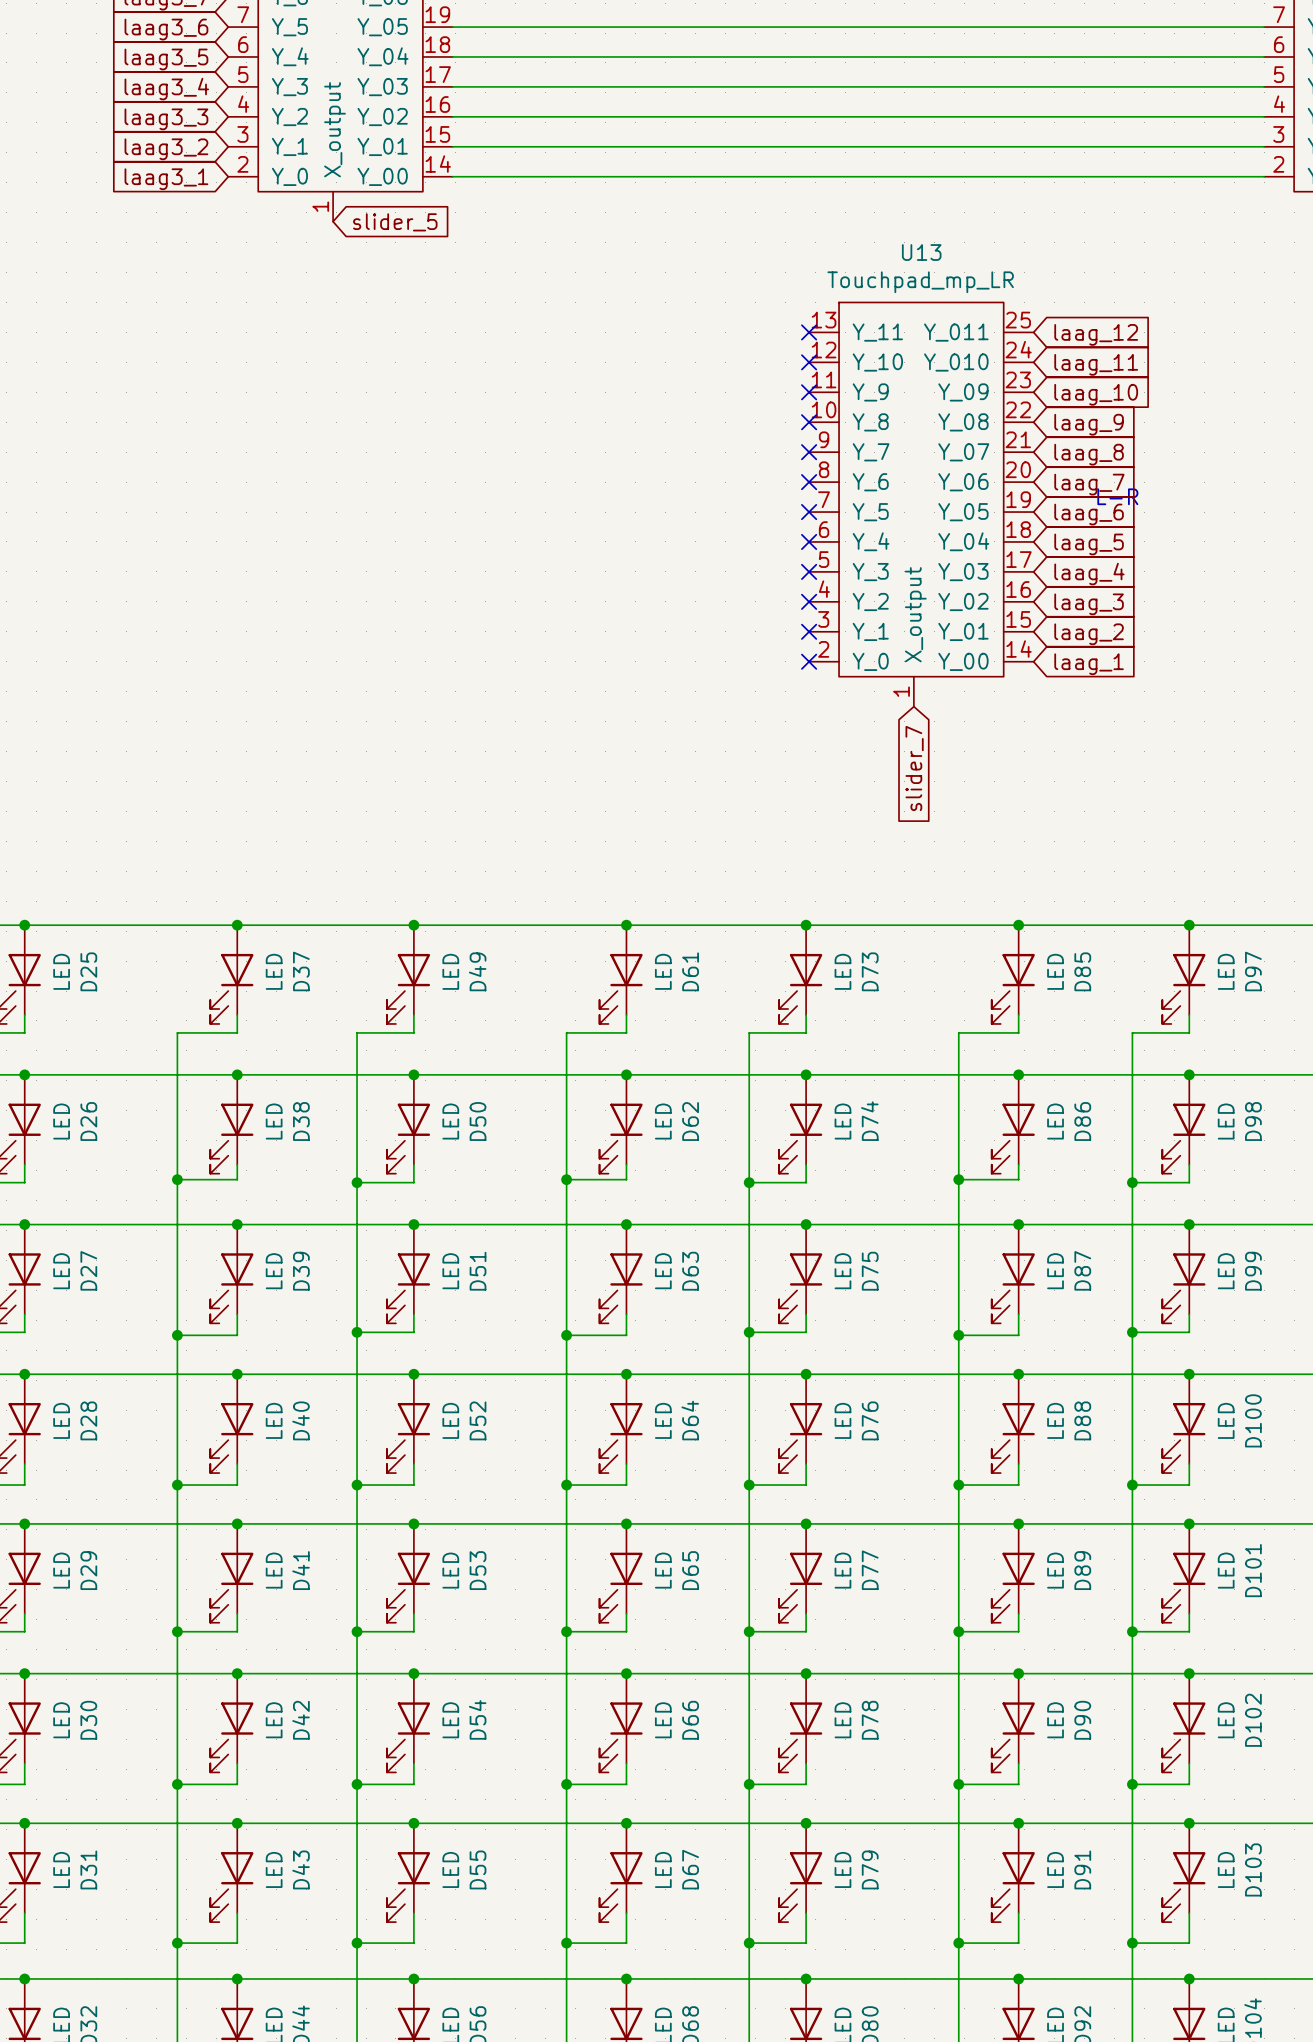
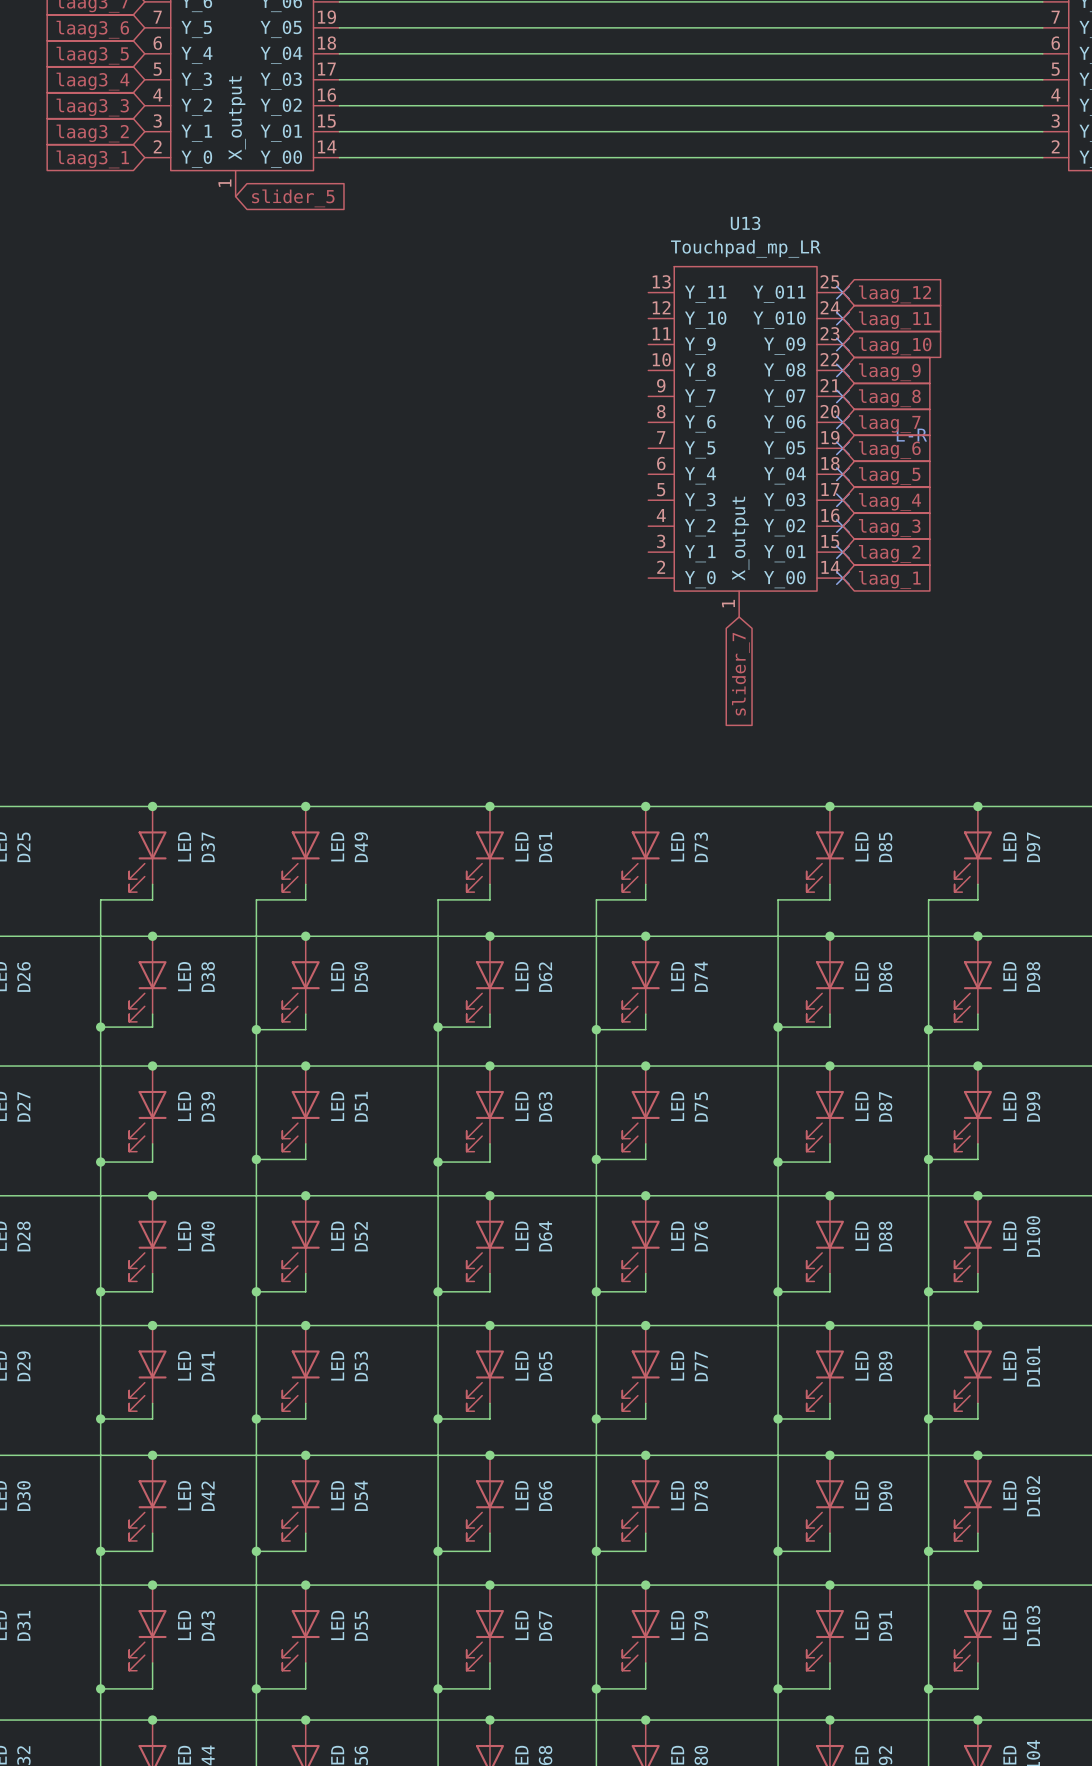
no-connect mark: (809, 332) -> none
no-connect mark: none -> (842, 292)
no-connect mark: (809, 362) -> none
no-connect mark: none -> (842, 318)
no-connect mark: (809, 392) -> none
no-connect mark: none -> (842, 344)
no-connect mark: (809, 422) -> none
no-connect mark: none -> (842, 370)
no-connect mark: (809, 452) -> none
no-connect mark: none -> (842, 396)
no-connect mark: (809, 482) -> none
no-connect mark: none -> (842, 422)
no-connect mark: (809, 512) -> none
no-connect mark: none -> (842, 448)
no-connect mark: (809, 541) -> none
no-connect mark: none -> (842, 474)
no-connect mark: (809, 571) -> none
no-connect mark: none -> (842, 500)
no-connect mark: (809, 601) -> none
no-connect mark: none -> (842, 526)
no-connect mark: (809, 631) -> none
no-connect mark: none -> (842, 552)
no-connect mark: (809, 661) -> none
no-connect mark: none -> (842, 578)

